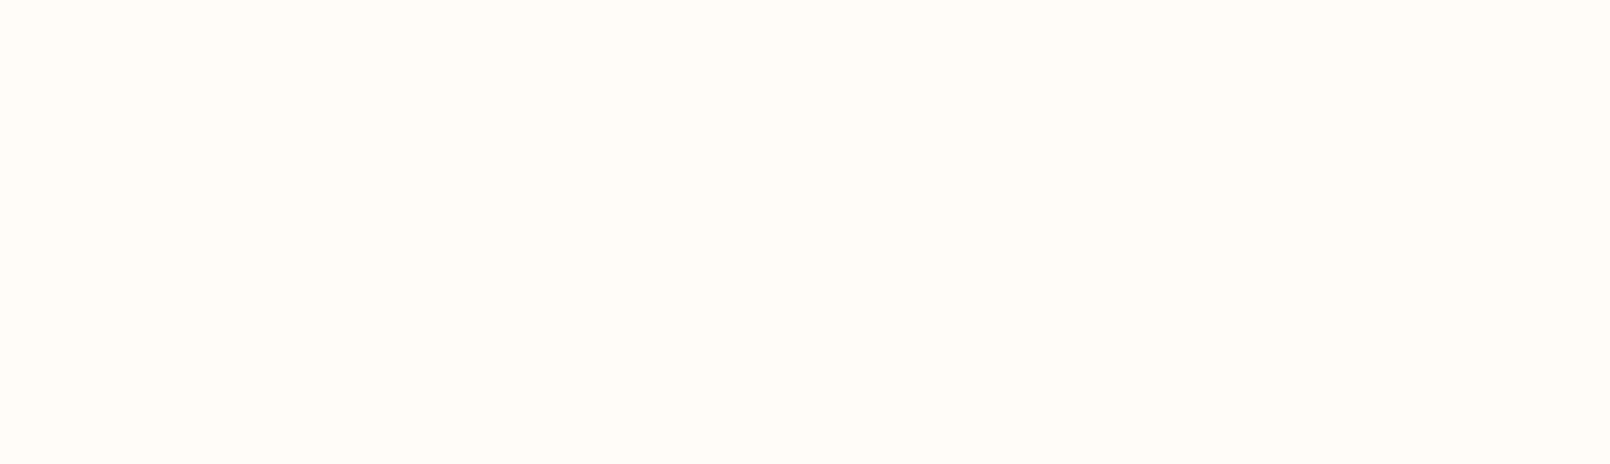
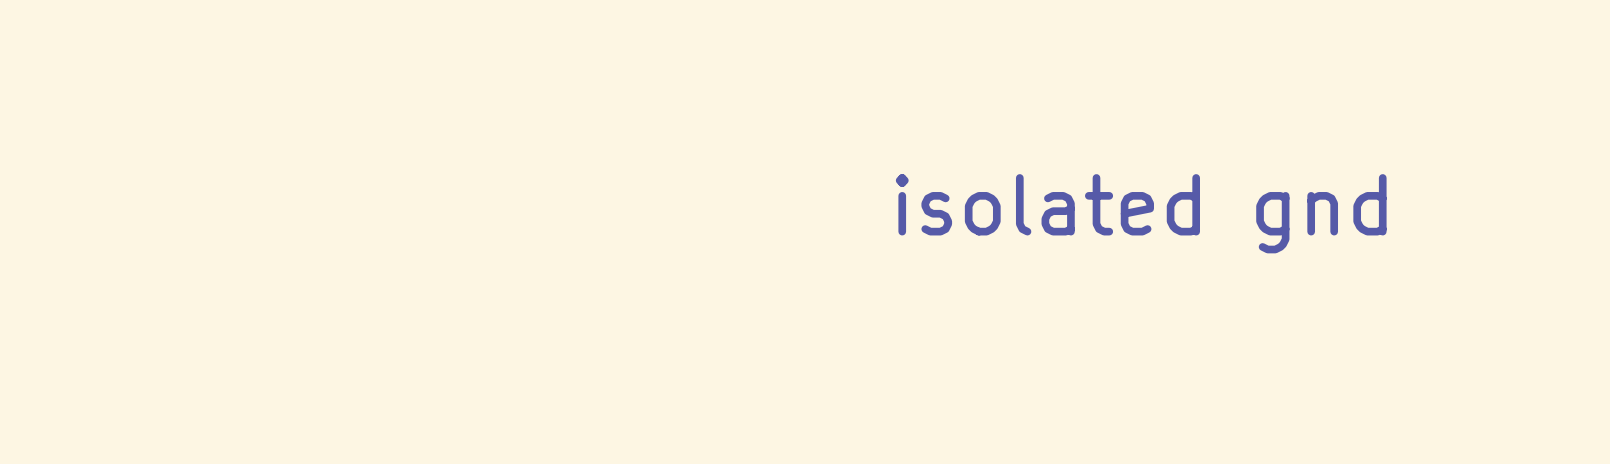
text: none -> isolated gnd (1141, 213)

